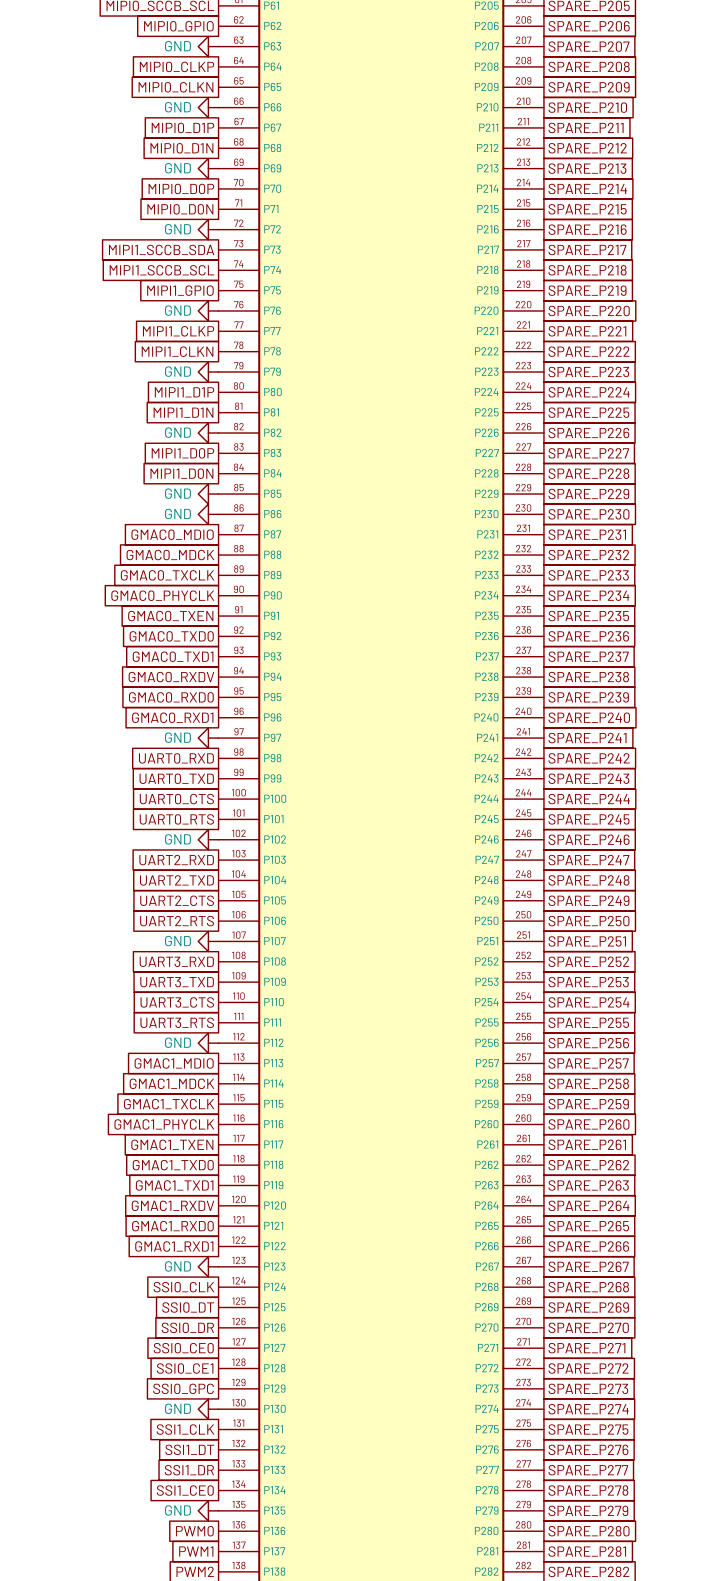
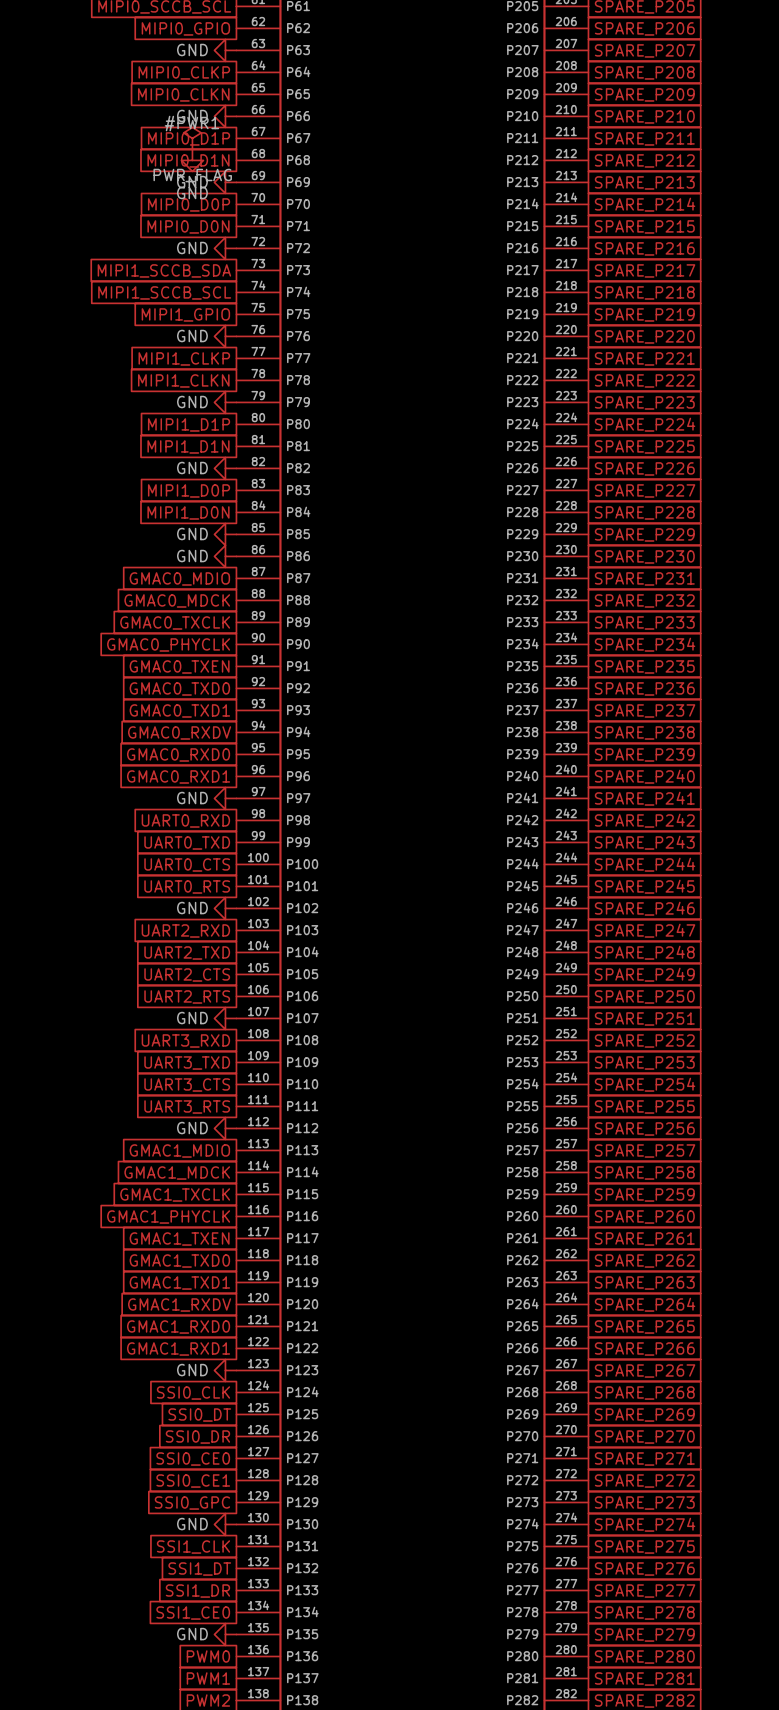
#PWR1: none -> PWR_FLAG (192, 138)
power symbol: none -> GND (192, 160)

